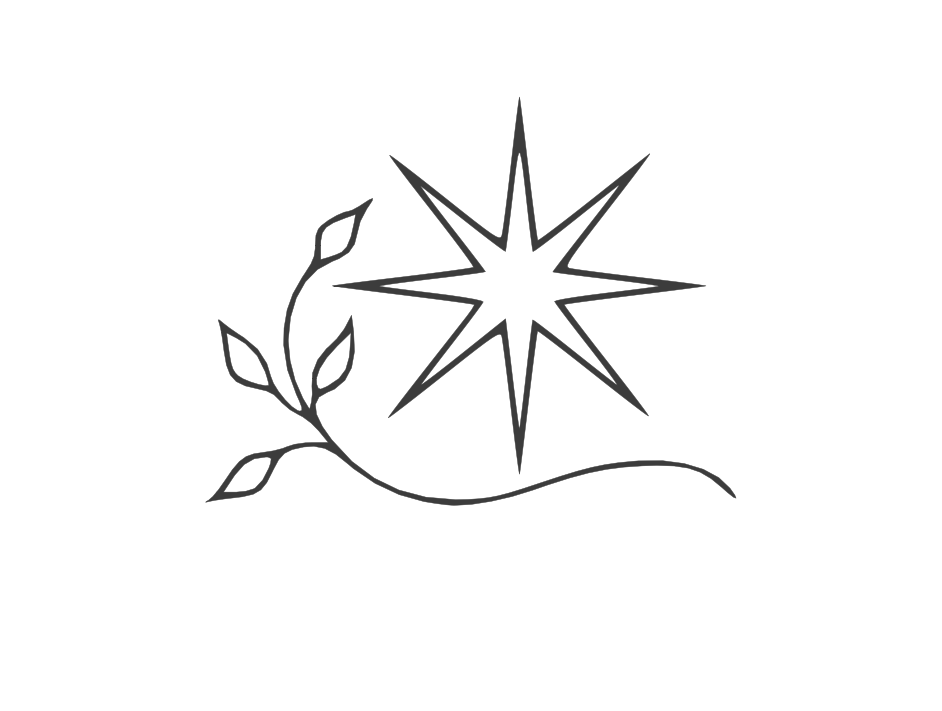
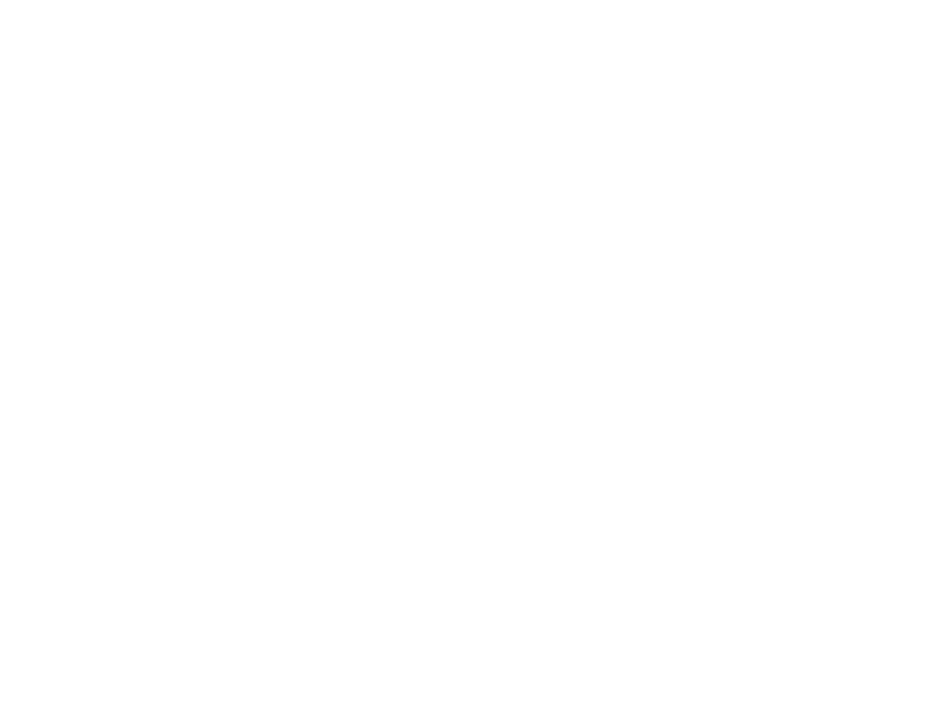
drawing: [205, 96, 737, 506] -> none

